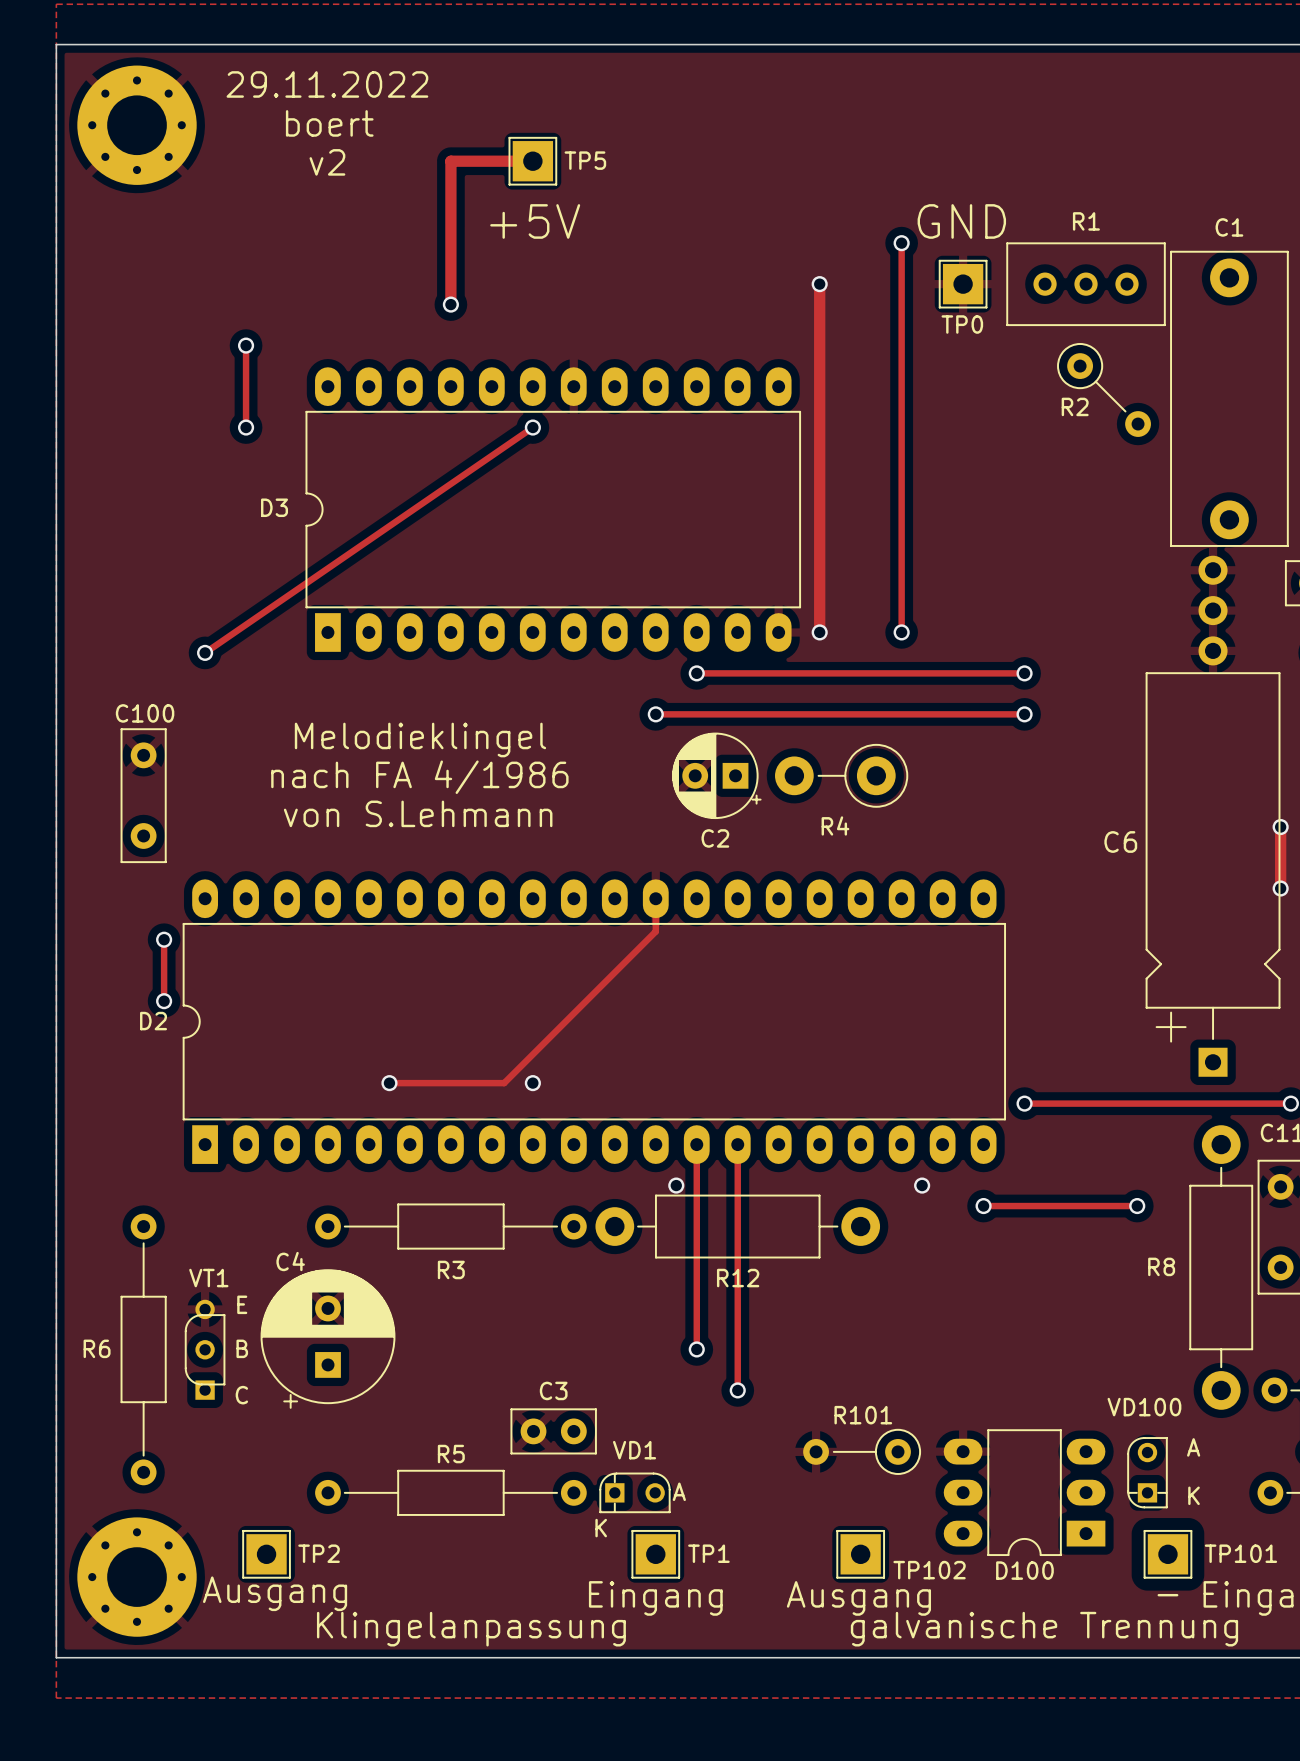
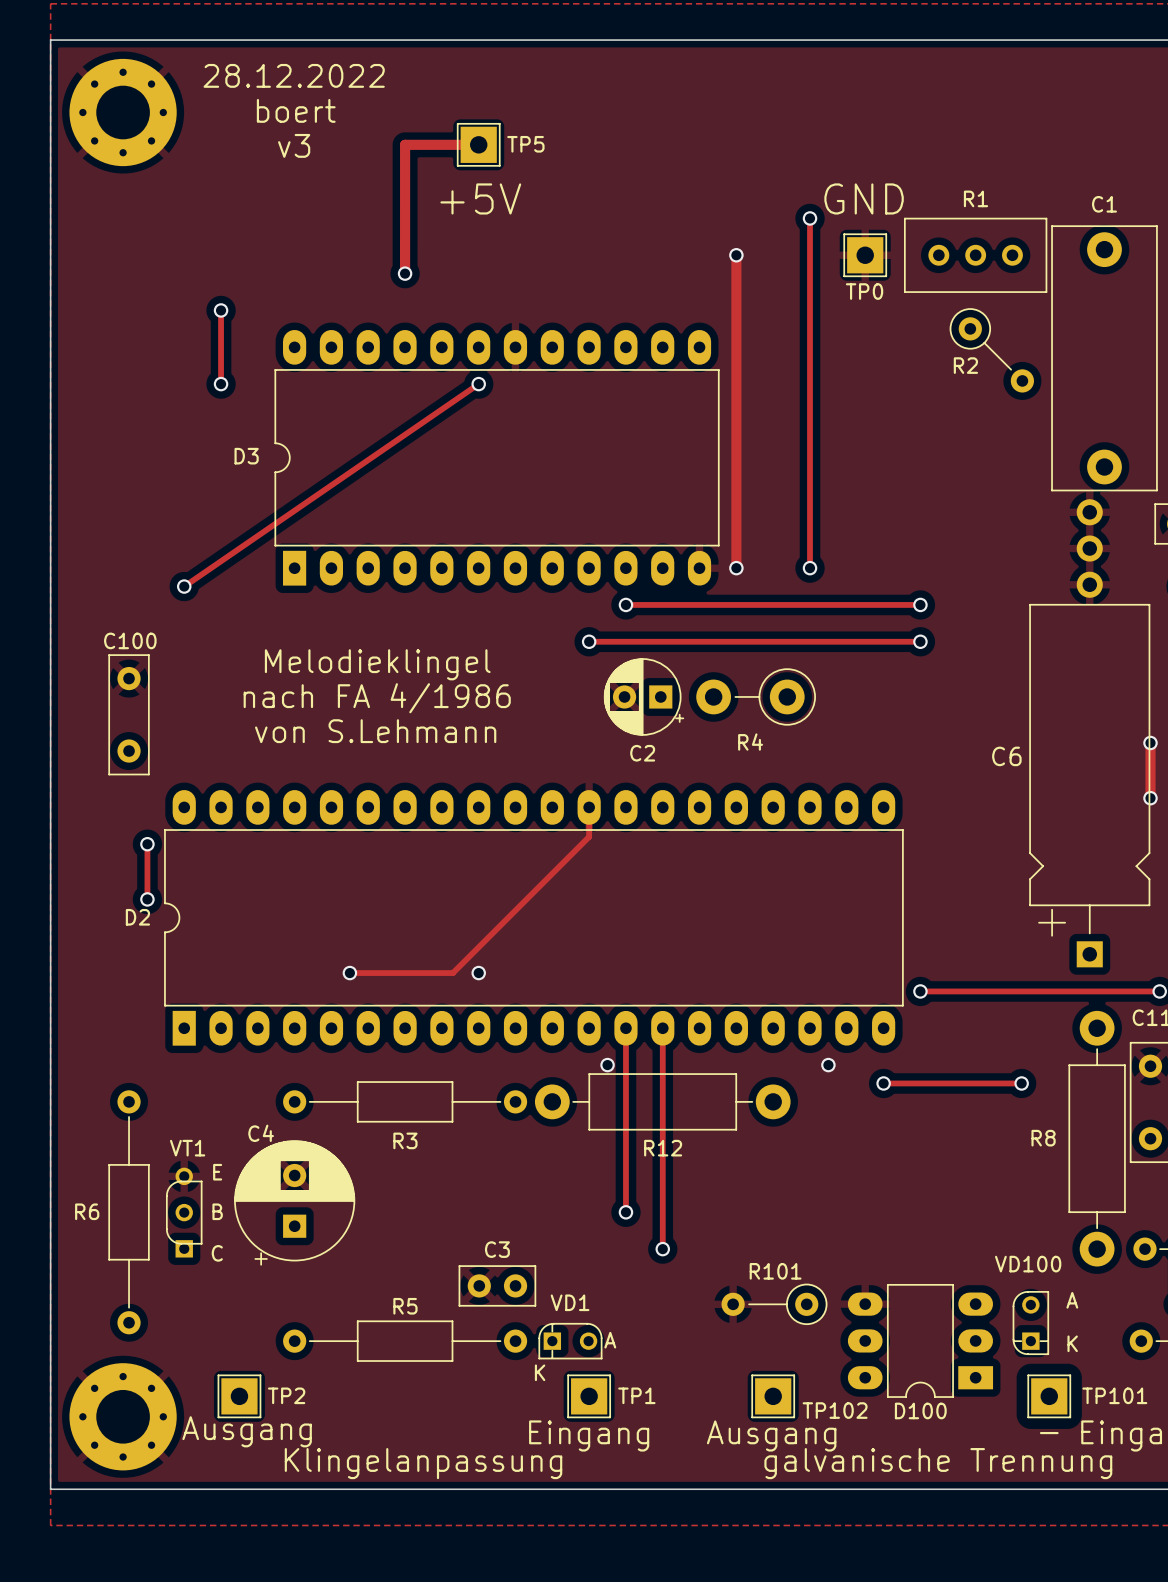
text: 29.11.2022 (327, 84) -> 28.12.2022 (294, 75)
text: v2 (327, 162) -> v3 (294, 145)

